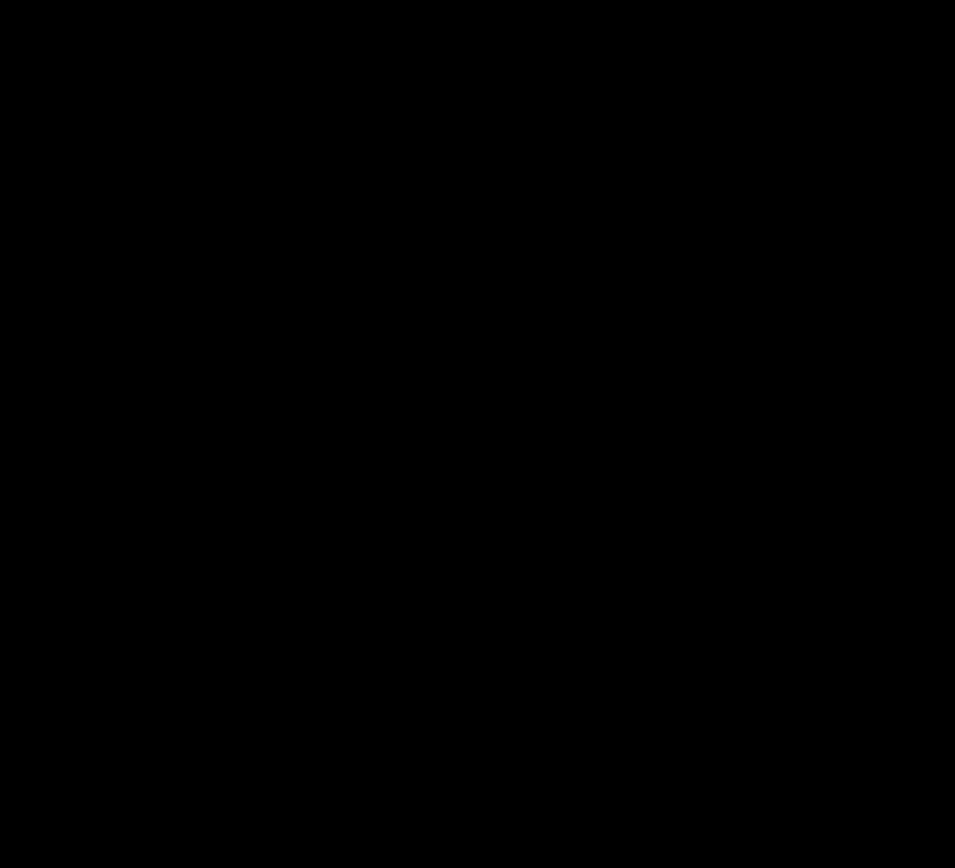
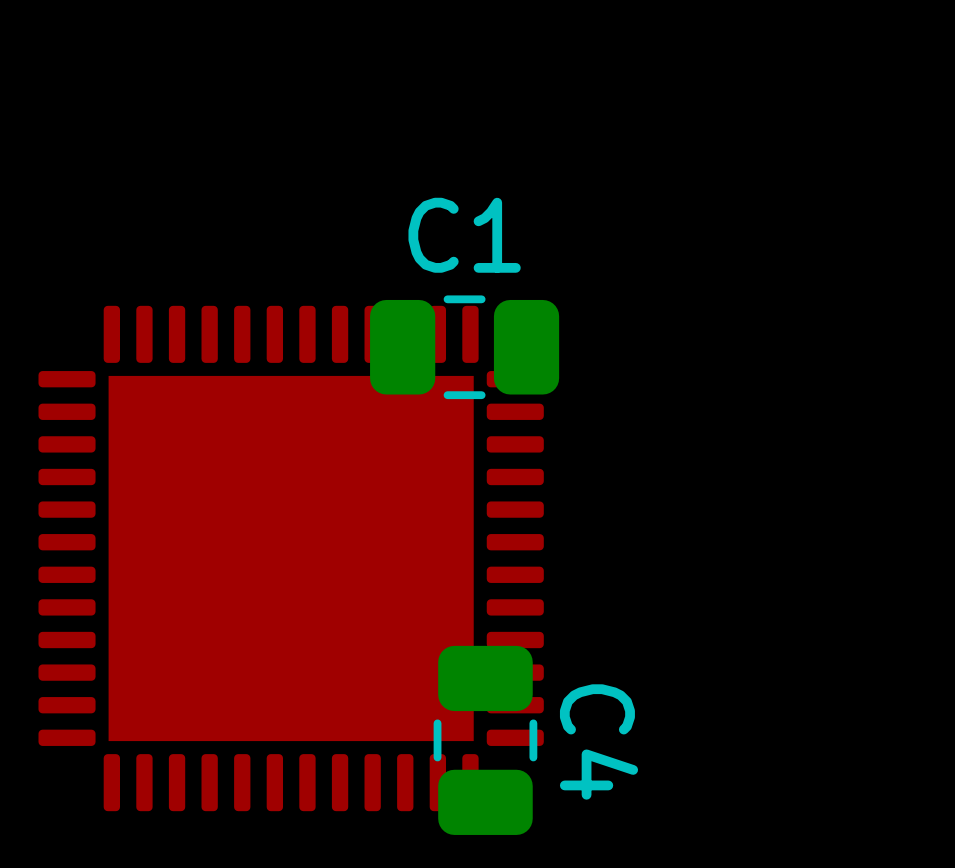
C1: none -> (464, 347)
part: none -> (291, 558)
C4: none -> (485, 740)

